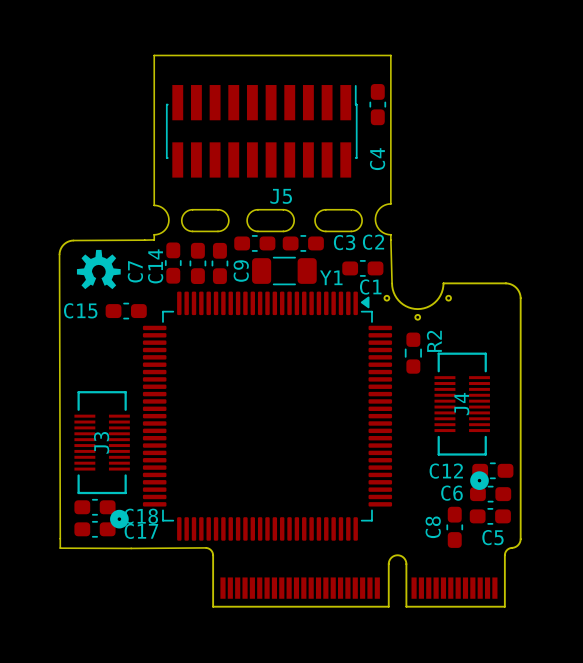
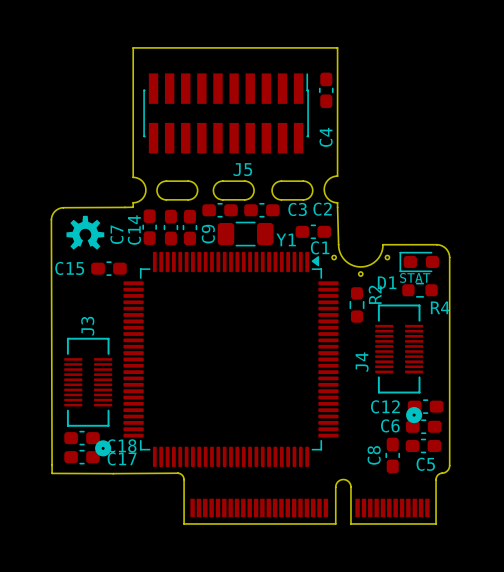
D1: none -> (419, 261)
text: none -> STAT (415, 277)
R4: none -> (419, 290)
J4 name position: J4 (461, 404) -> J4 (362, 362)
J3 name position: J3 (101, 442) -> J3 (87, 326)

